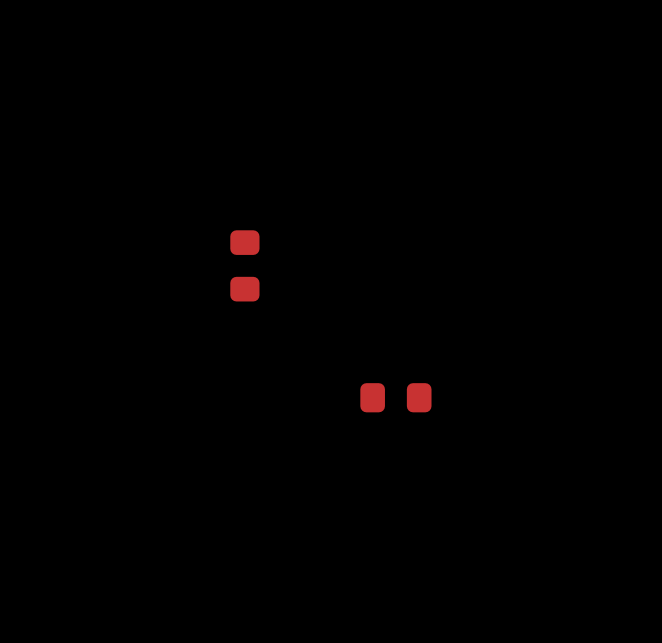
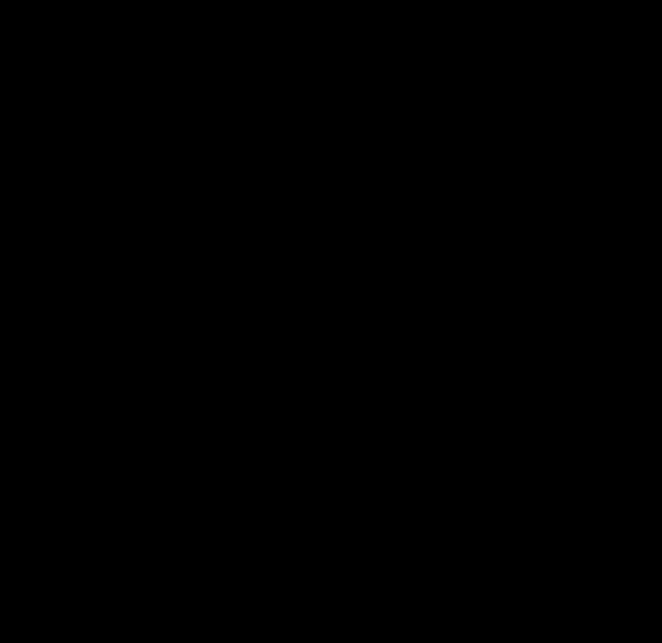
part: (244, 265) -> none
part: (395, 397) -> none

